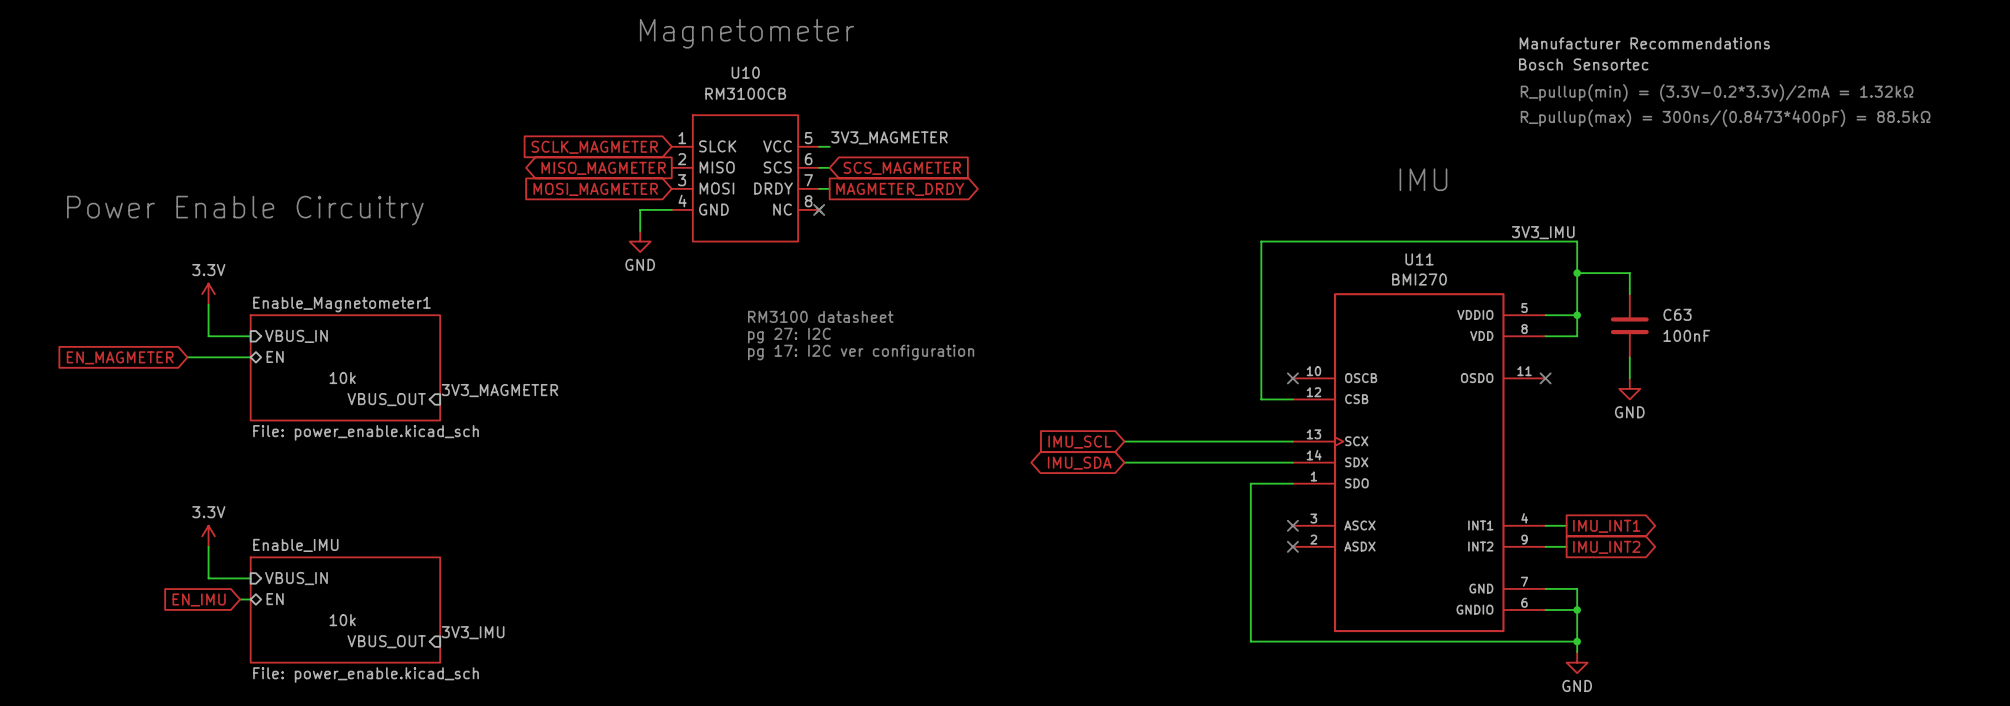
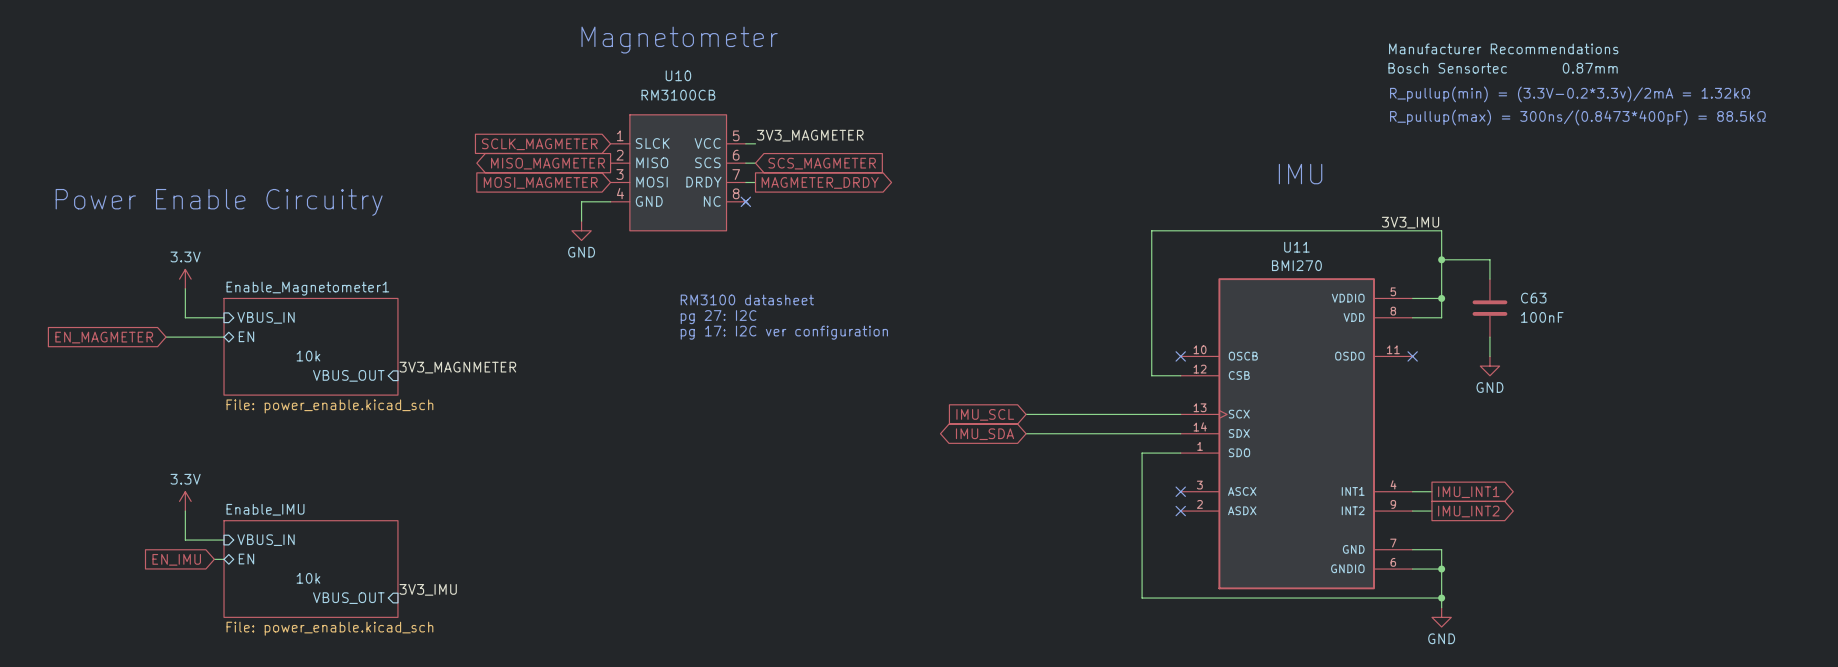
U11 text: none -> 0.87mm (1590, 68)
label: 3V3_MAGMETER (499, 390) -> 3V3_MAGNMETER (457, 367)

